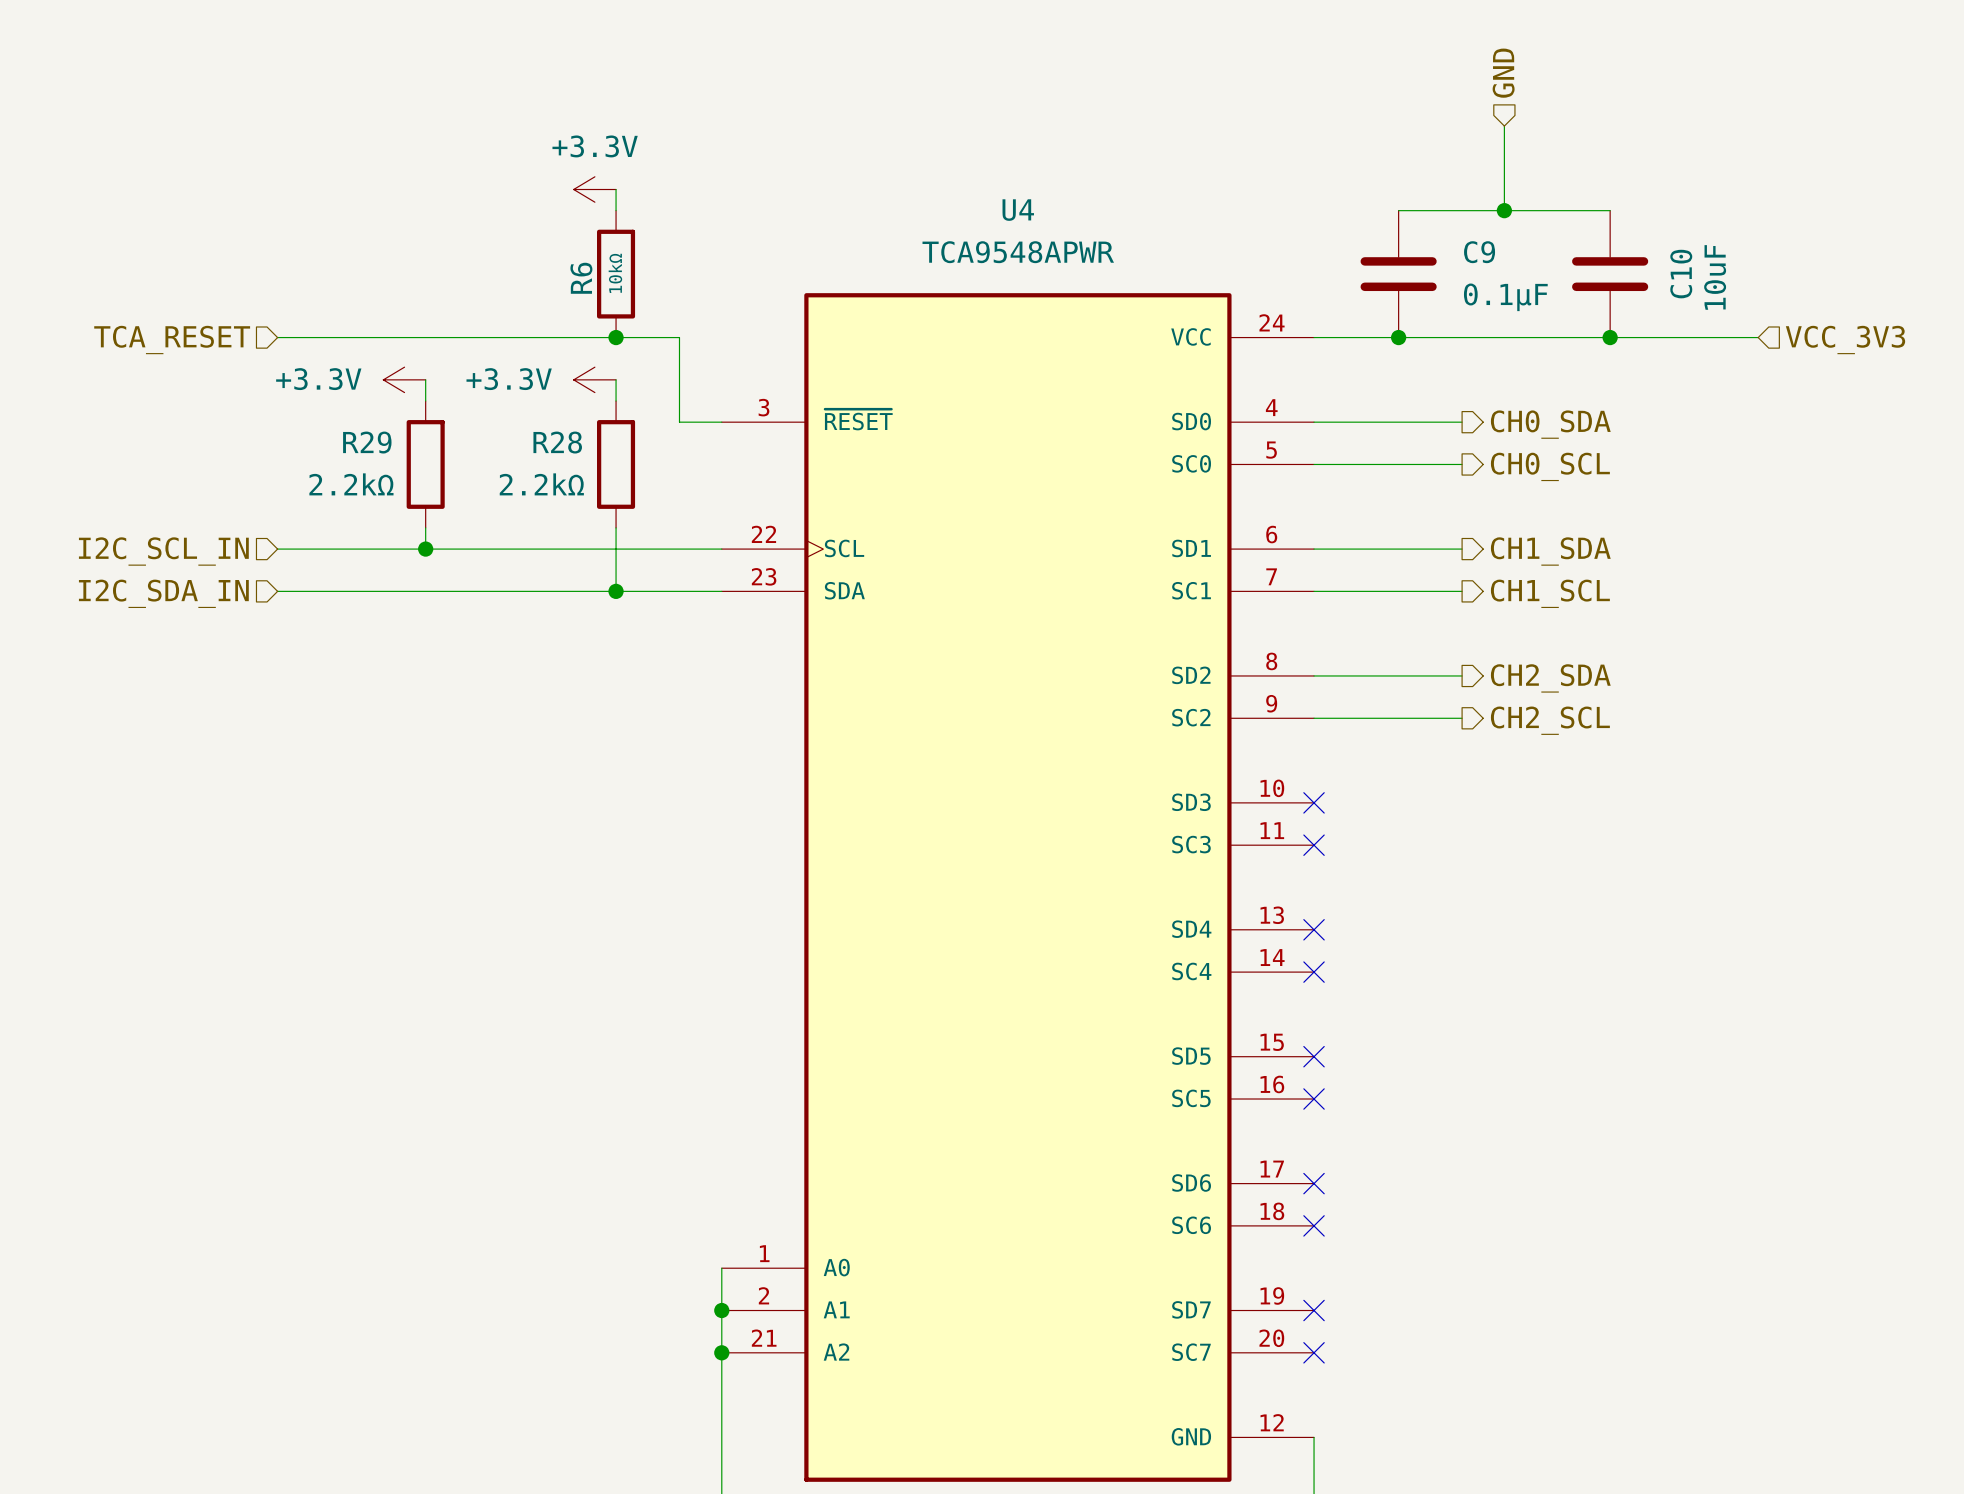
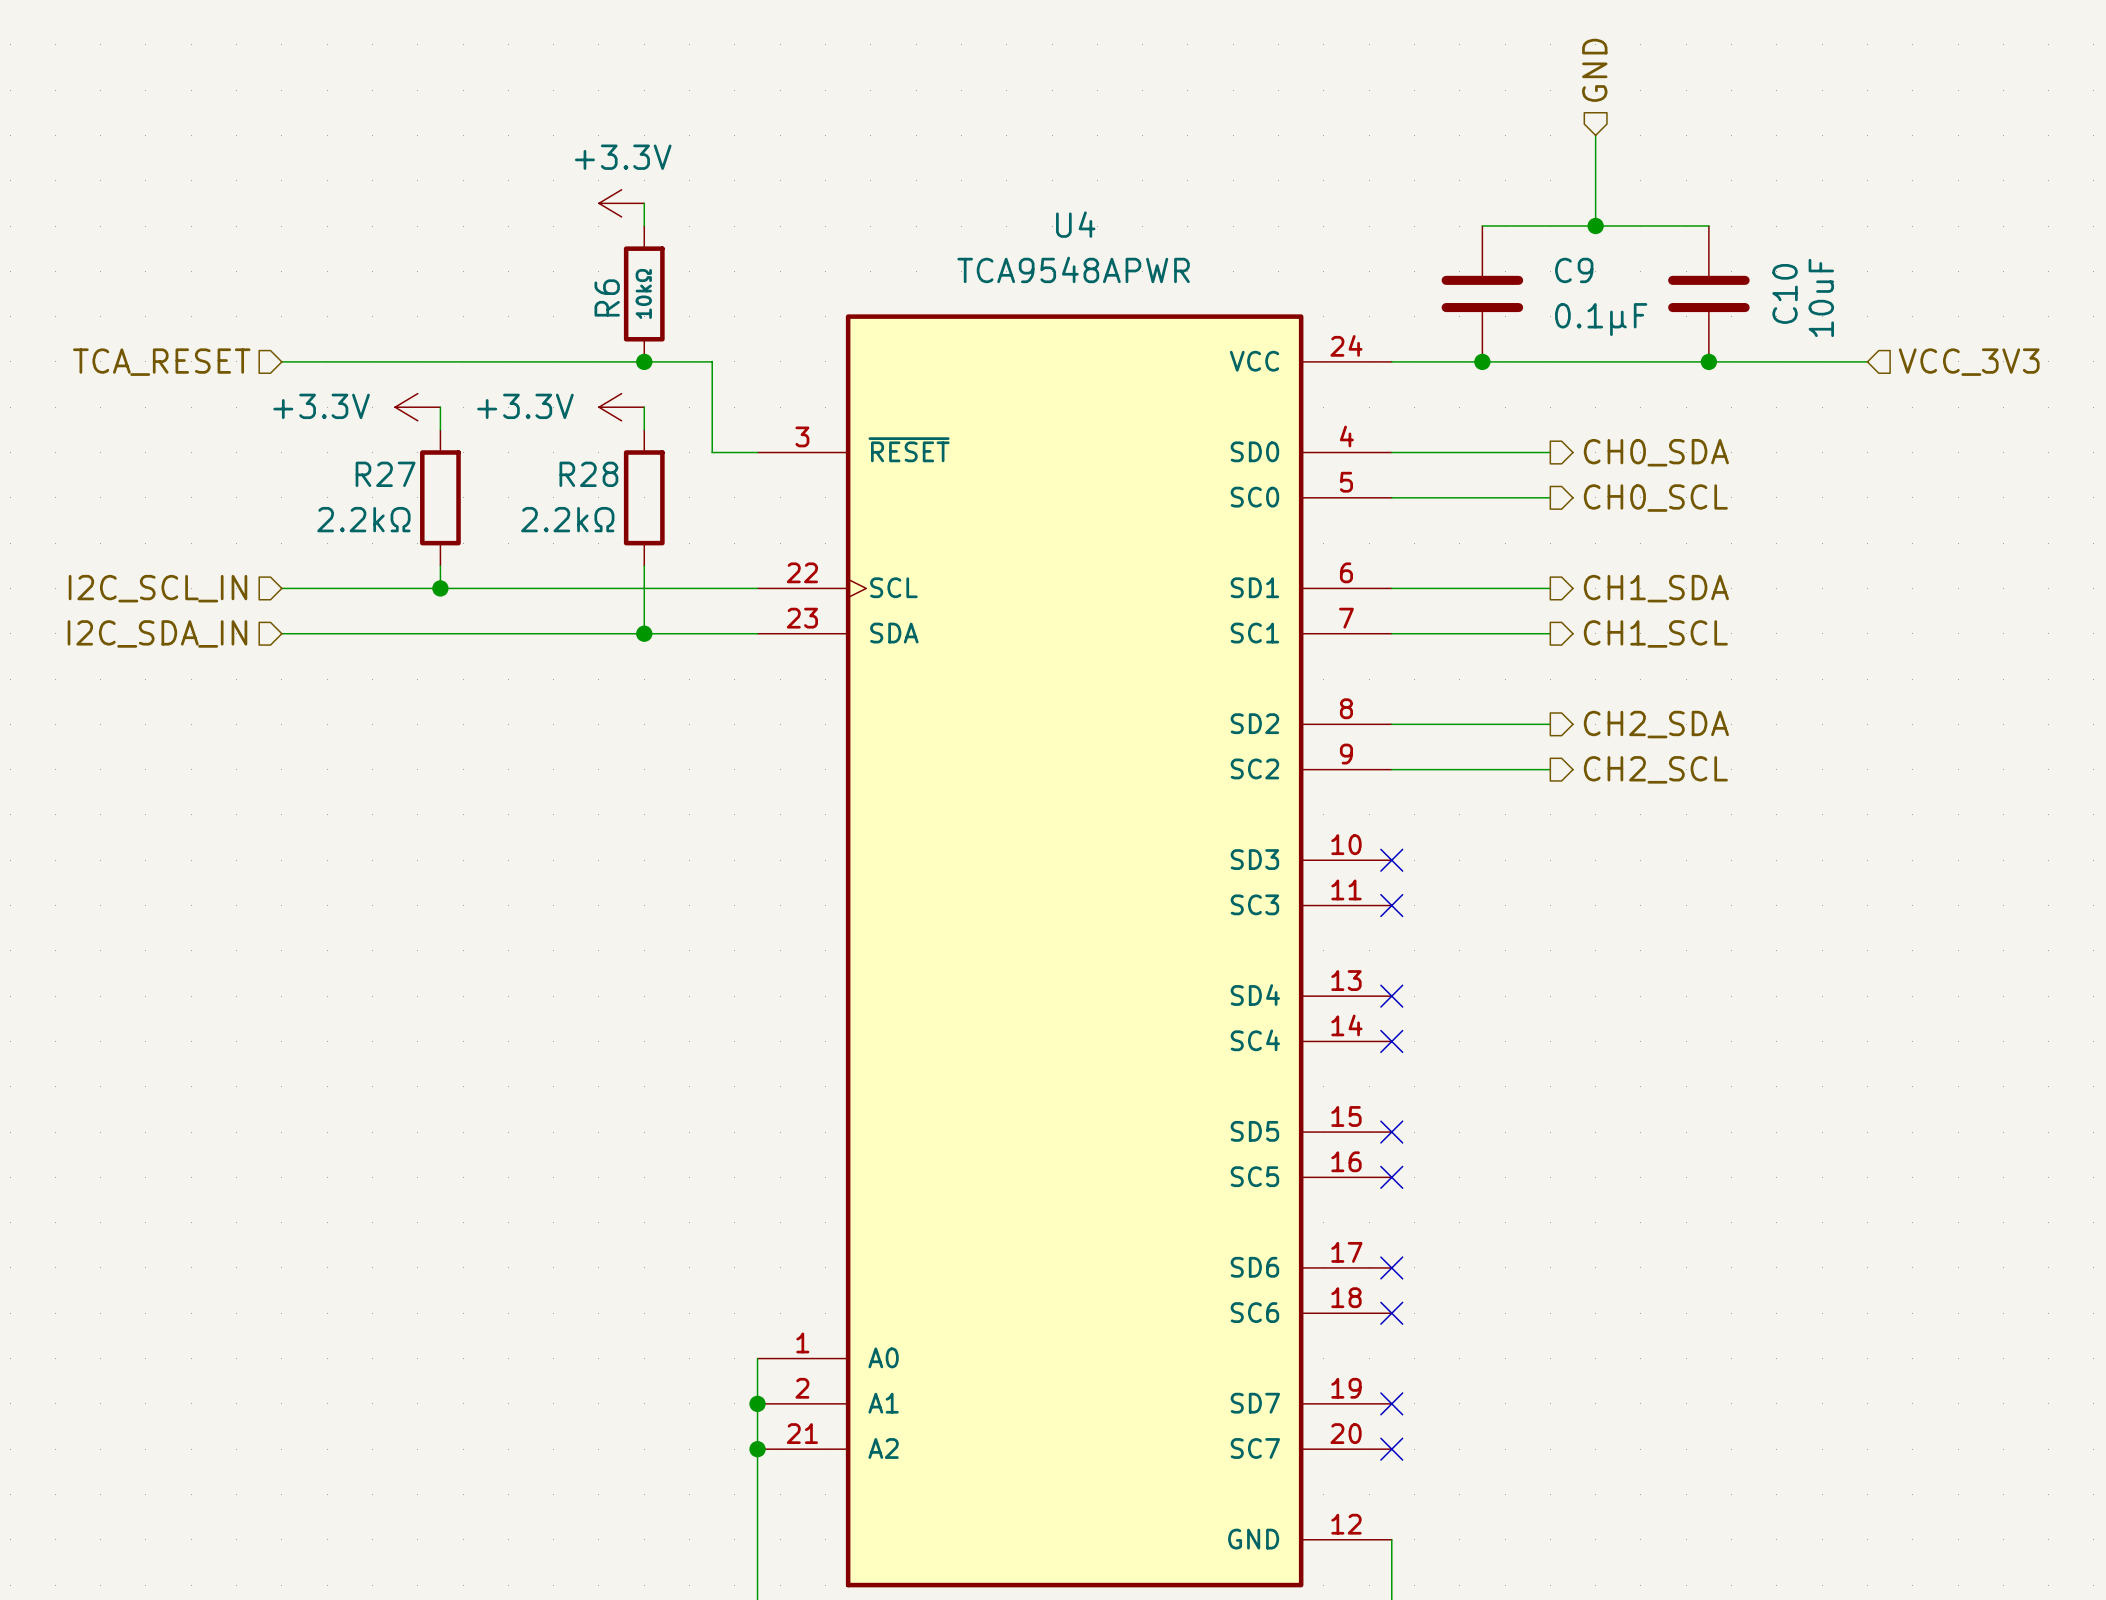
R29 name: R29 (367, 442) -> R27 (385, 474)

